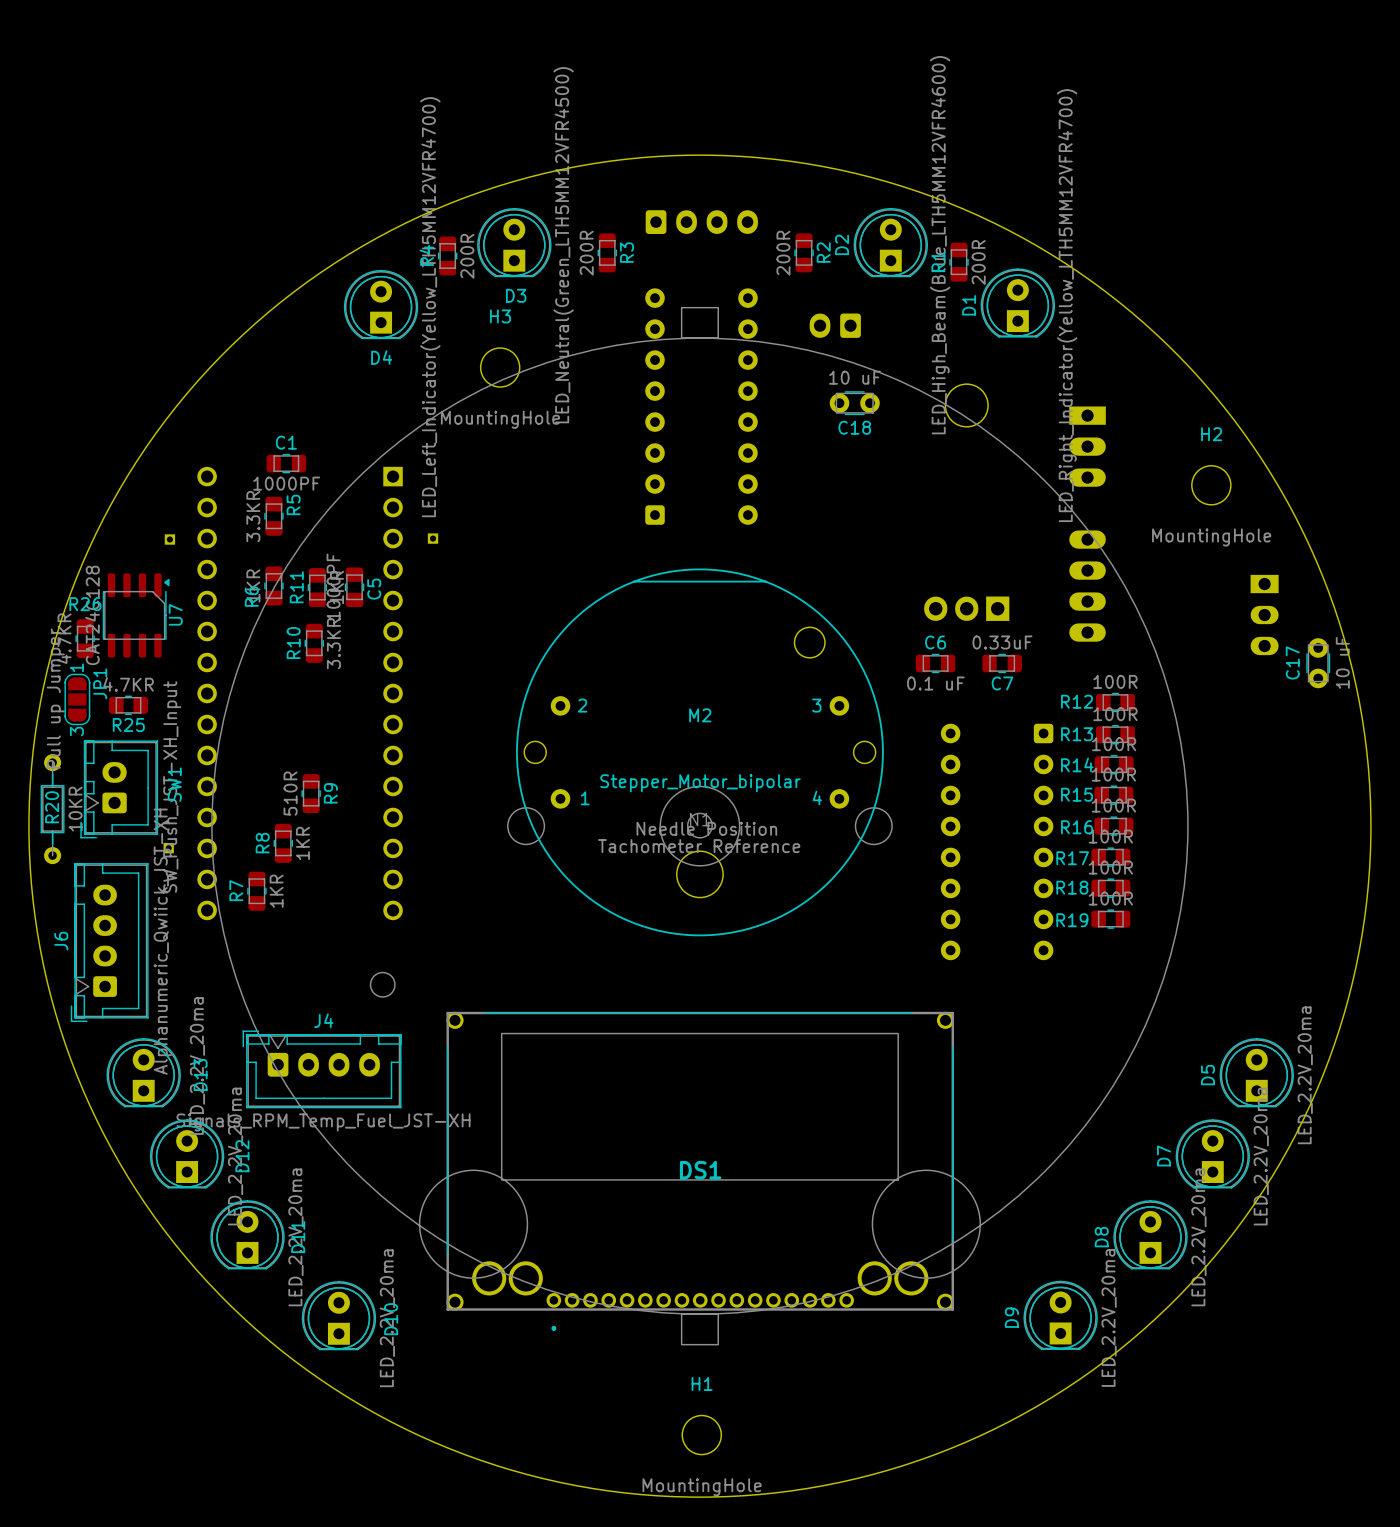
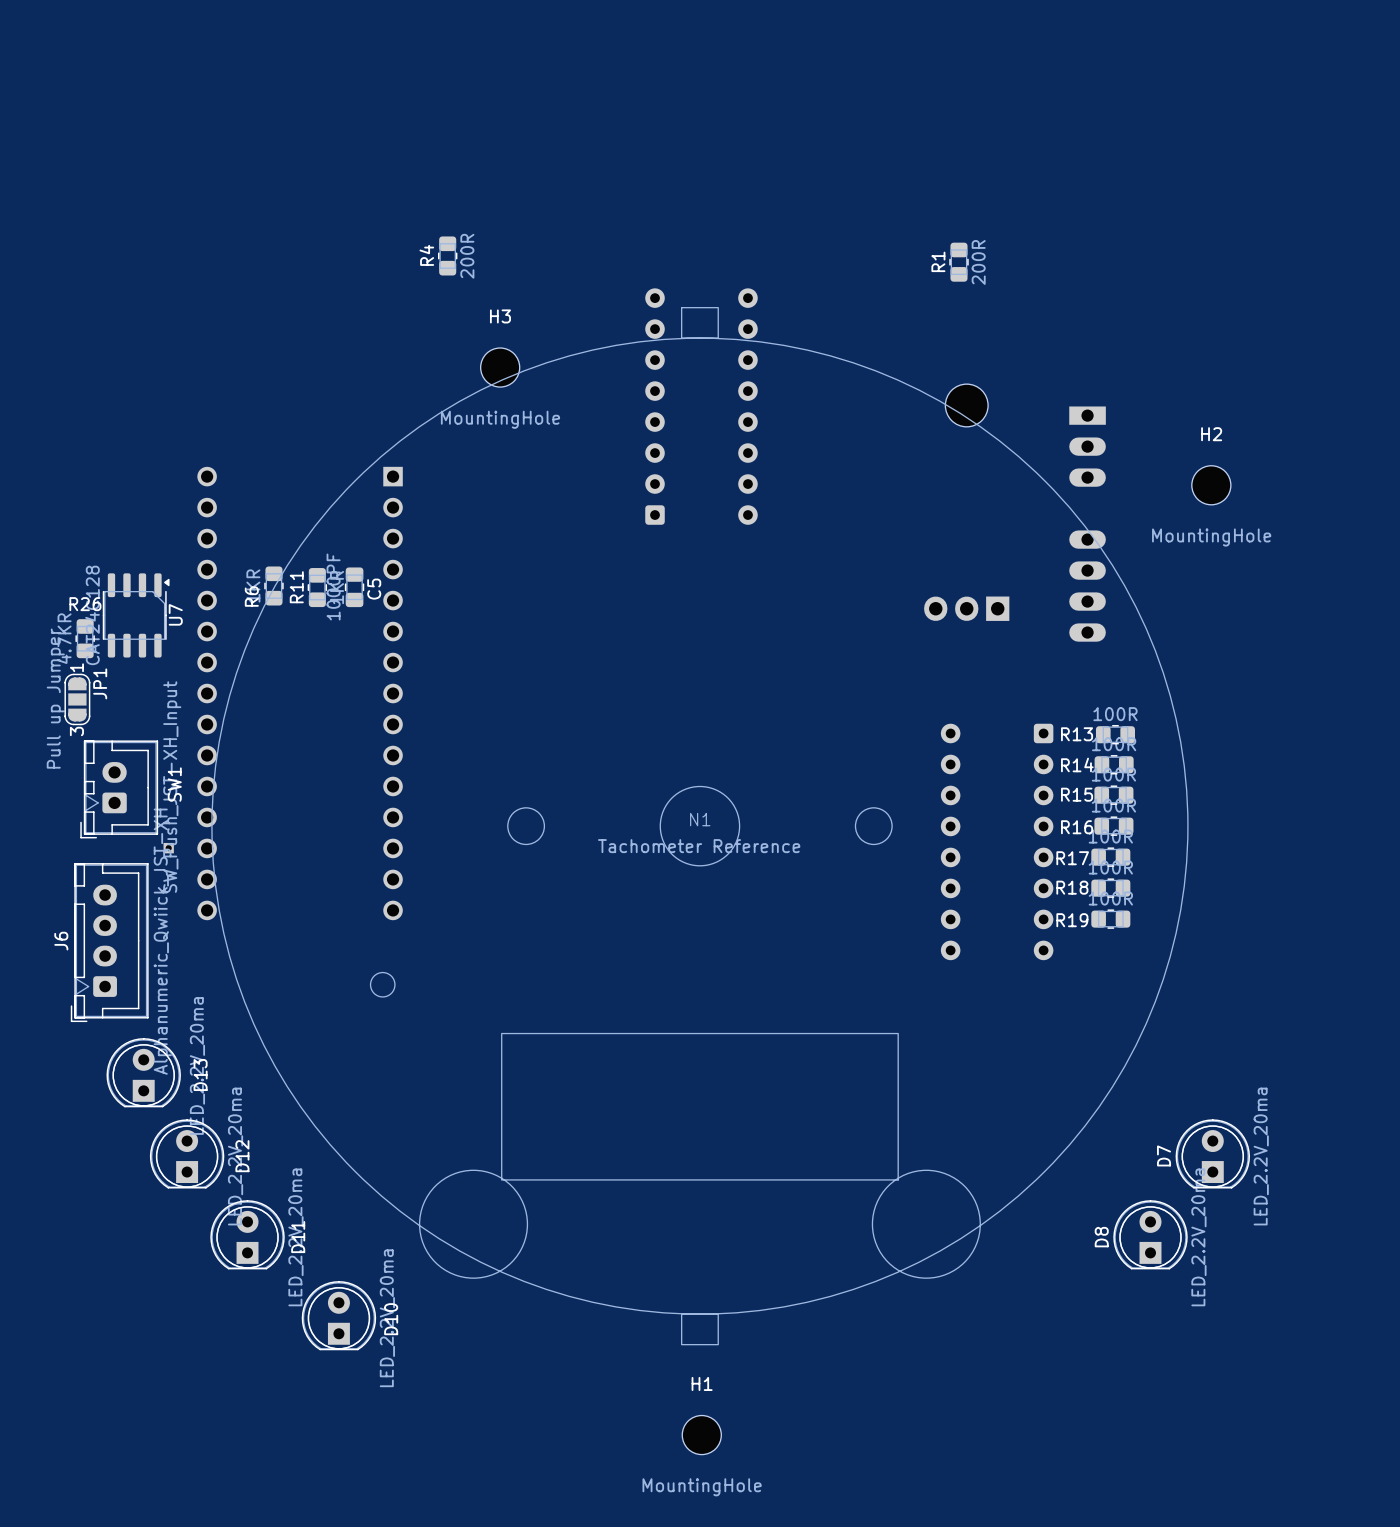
round board edge: [28, 154, 1372, 1498] -> none
part: (701, 222) -> none
D3: LED_Neutral(Green_LTH5MM12VFR4500) (514, 242) -> none
D2: LED_High_Beam(Blue_LTH5MM12VFR4600) (890, 242) -> none
R3: 200R (607, 252) -> none
R2: 200R (804, 252) -> none
D1: LED_Right_Indicator(Yellow_LTH5MM12VFR4700) (1017, 302) -> none
D4: LED_Left_Indicator(Yellow_LTH5MM12VFR4700) (381, 304) -> none
part: (835, 325) -> none
C18: 10 uF (854, 403) -> none
C1: 1000PF (286, 463) -> none
R5: 3.3KR (273, 516) -> none
part: (433, 538) -> none
part: (169, 539) -> none
part: (1264, 615) -> none
R10: 3.3KR (314, 643) -> none
C6: 0.1 uF (935, 663) -> none
C7: 0.33uF (1002, 663) -> none
C17: 10 uF (1318, 663) -> none
R12: 100R (1115, 702) -> none
R25: 4.7KR (128, 705) -> none
M2: Stepper_Motor_bipolar (699, 752) -> none
R9: 510R (311, 793) -> none
R20: 10KR (52, 809) -> none
R8: 1KR (283, 843) -> none
R7: 1KR (256, 891) -> none
J4: Signals_RPM_Temp_Fuel_JST-XH (322, 1069) -> none
D5: LED_2.2V_20ma (1256, 1072) -> none
DS1: (700, 1171) -> none
D9: LED_2.2V_20ma (1060, 1315) -> none

